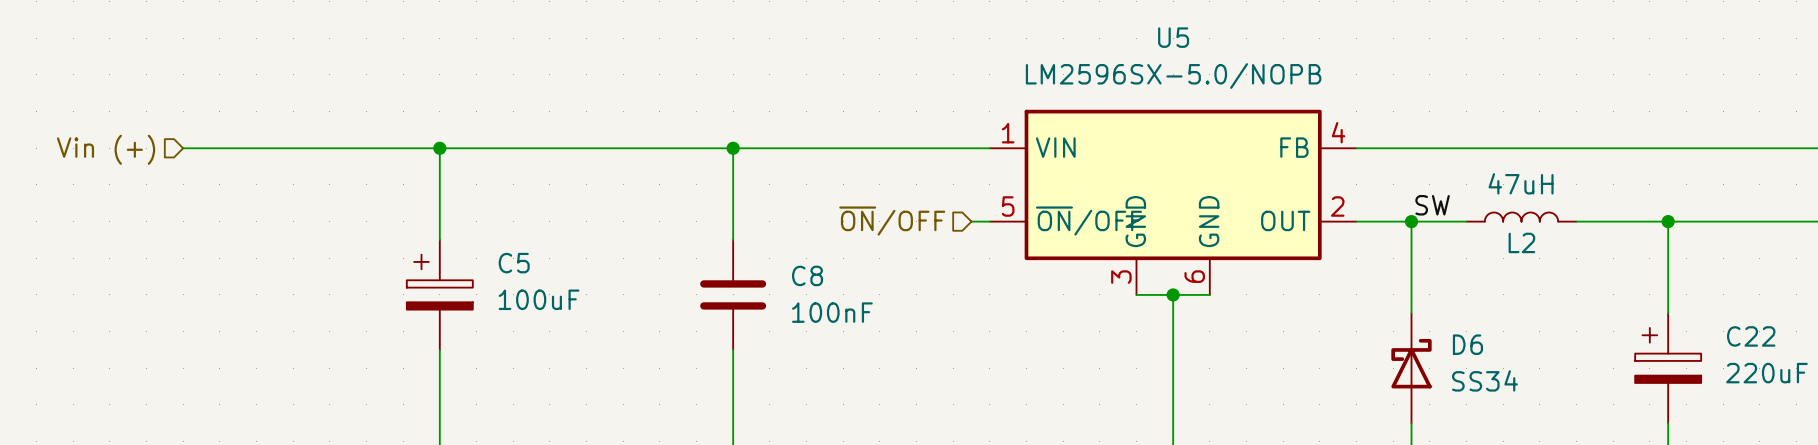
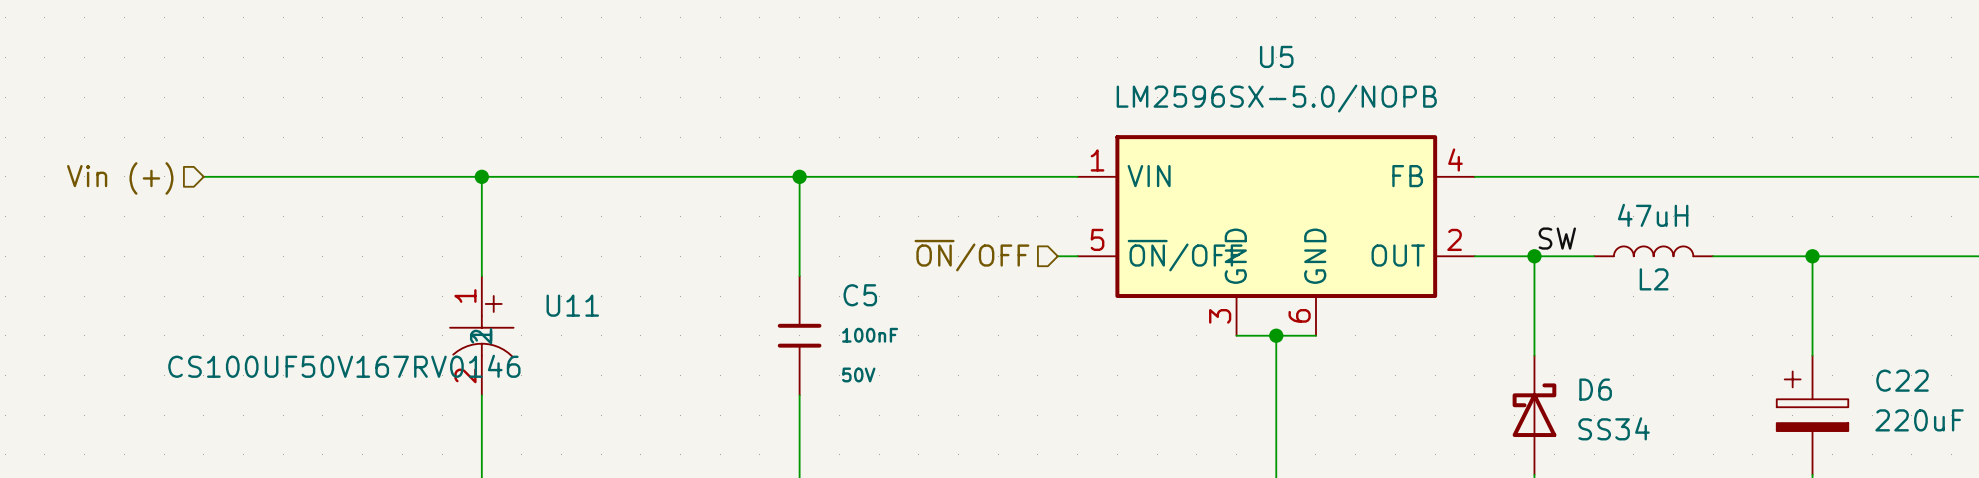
C5 symbol: [406, 239, 473, 350] -> [777, 276, 822, 396]
U11: none -> CS100UF50V167RV0146 (481, 335)
C8: 100nF (733, 294) -> none
C5 value: 100uF (539, 299) -> 100nF (870, 335)
C5 text: none -> 50V (858, 374)

